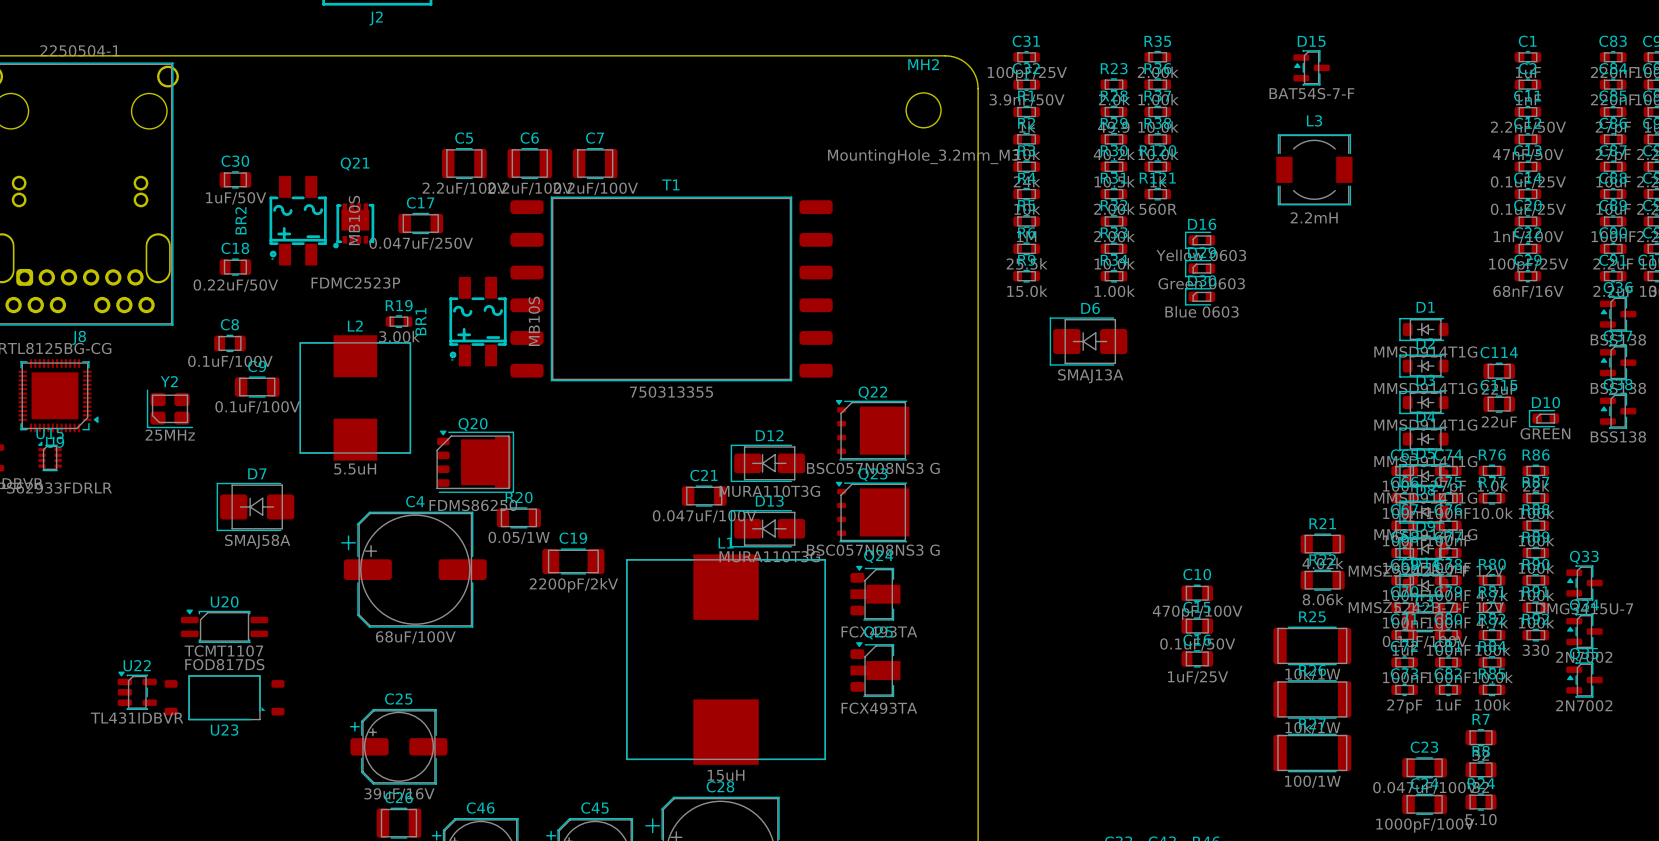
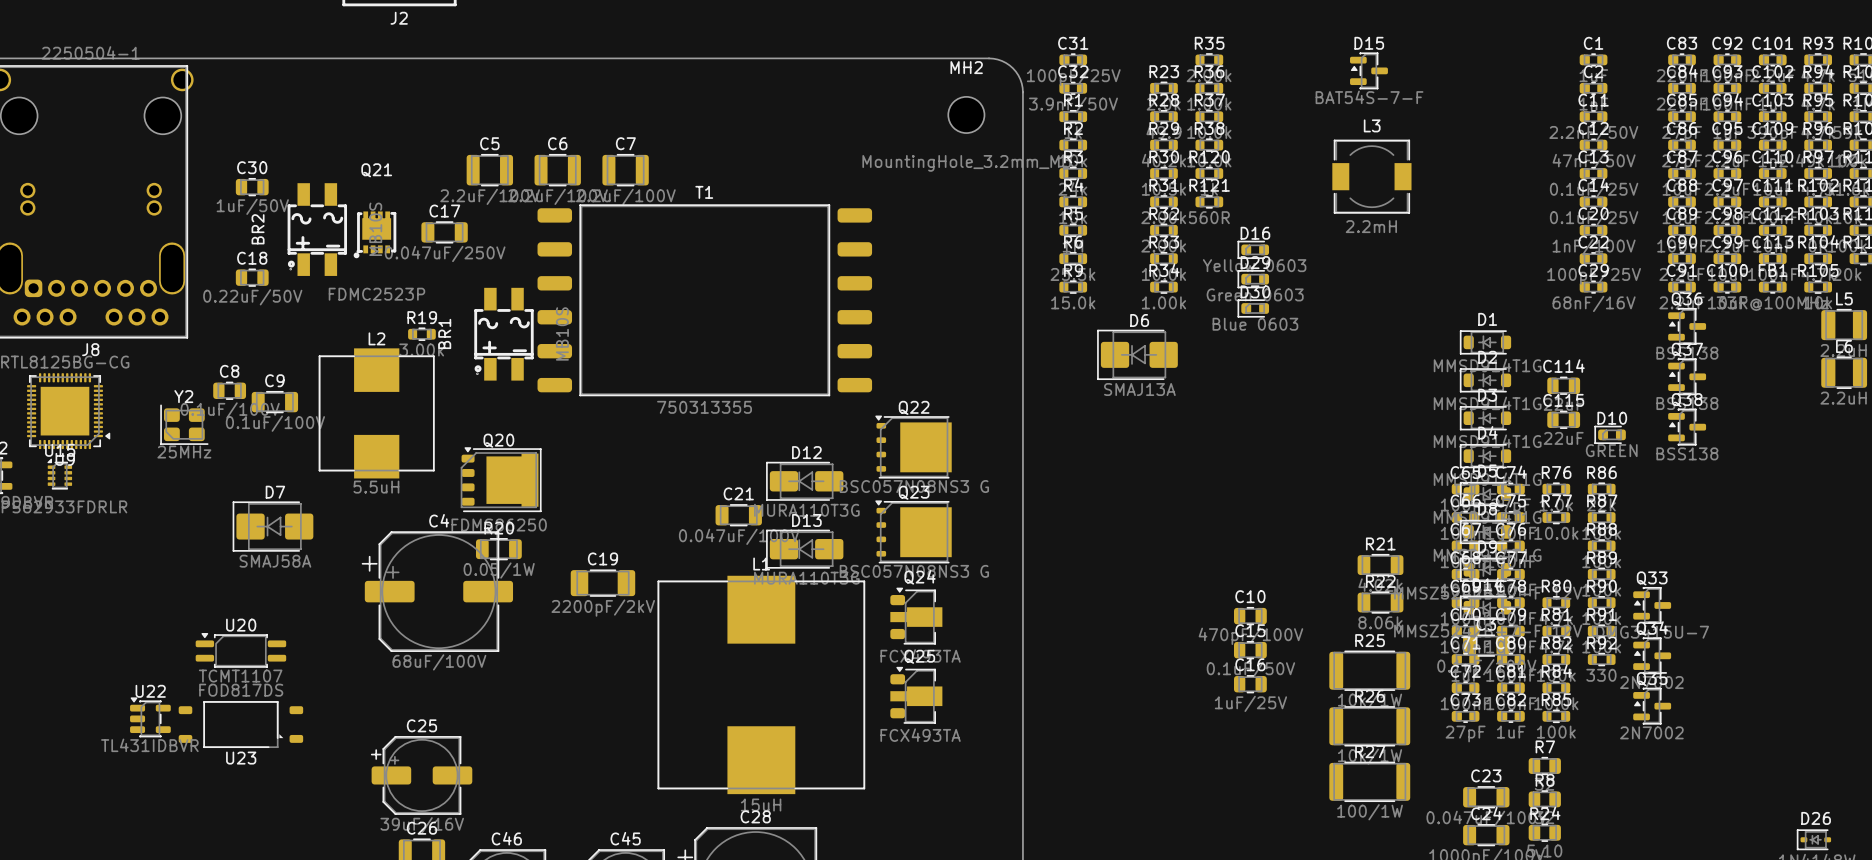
C8 position: (229, 343) -> (229, 390)
R20 position: (518, 517) -> (498, 549)

